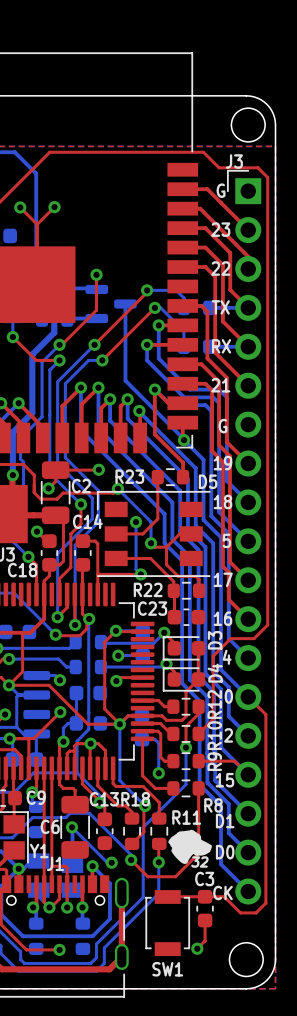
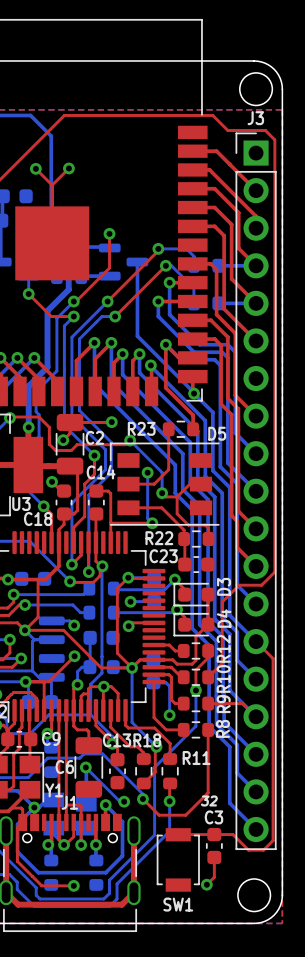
J3 footprint: [226, 169, 262, 905] -> [235, 132, 277, 851]
text: G (221, 190) -> none
text: 23 (220, 229) -> none
text: 22 (220, 268) -> none
text: TX (220, 307) -> none
text: RX (221, 346) -> none
text: 21 (220, 385) -> none
text: G (222, 426) -> none
text: 19 (222, 463) -> none
text: 18 (222, 501) -> none
text: 5 (226, 540) -> none
text: 17 (223, 579) -> none
text: 16 (222, 618) -> none
text: 4 (227, 657) -> none
text: 0 (228, 696) -> none
text: 2 (228, 735) -> none
text: 15 (224, 780) -> none
R8 name rotation: 0° (213, 805) -> 90° counterclockwise (222, 728)
text: D1 (225, 821) -> none
drawing: [168, 829, 212, 864] -> none
text: D0 (225, 852) -> none
text: CK (222, 893) -> none

